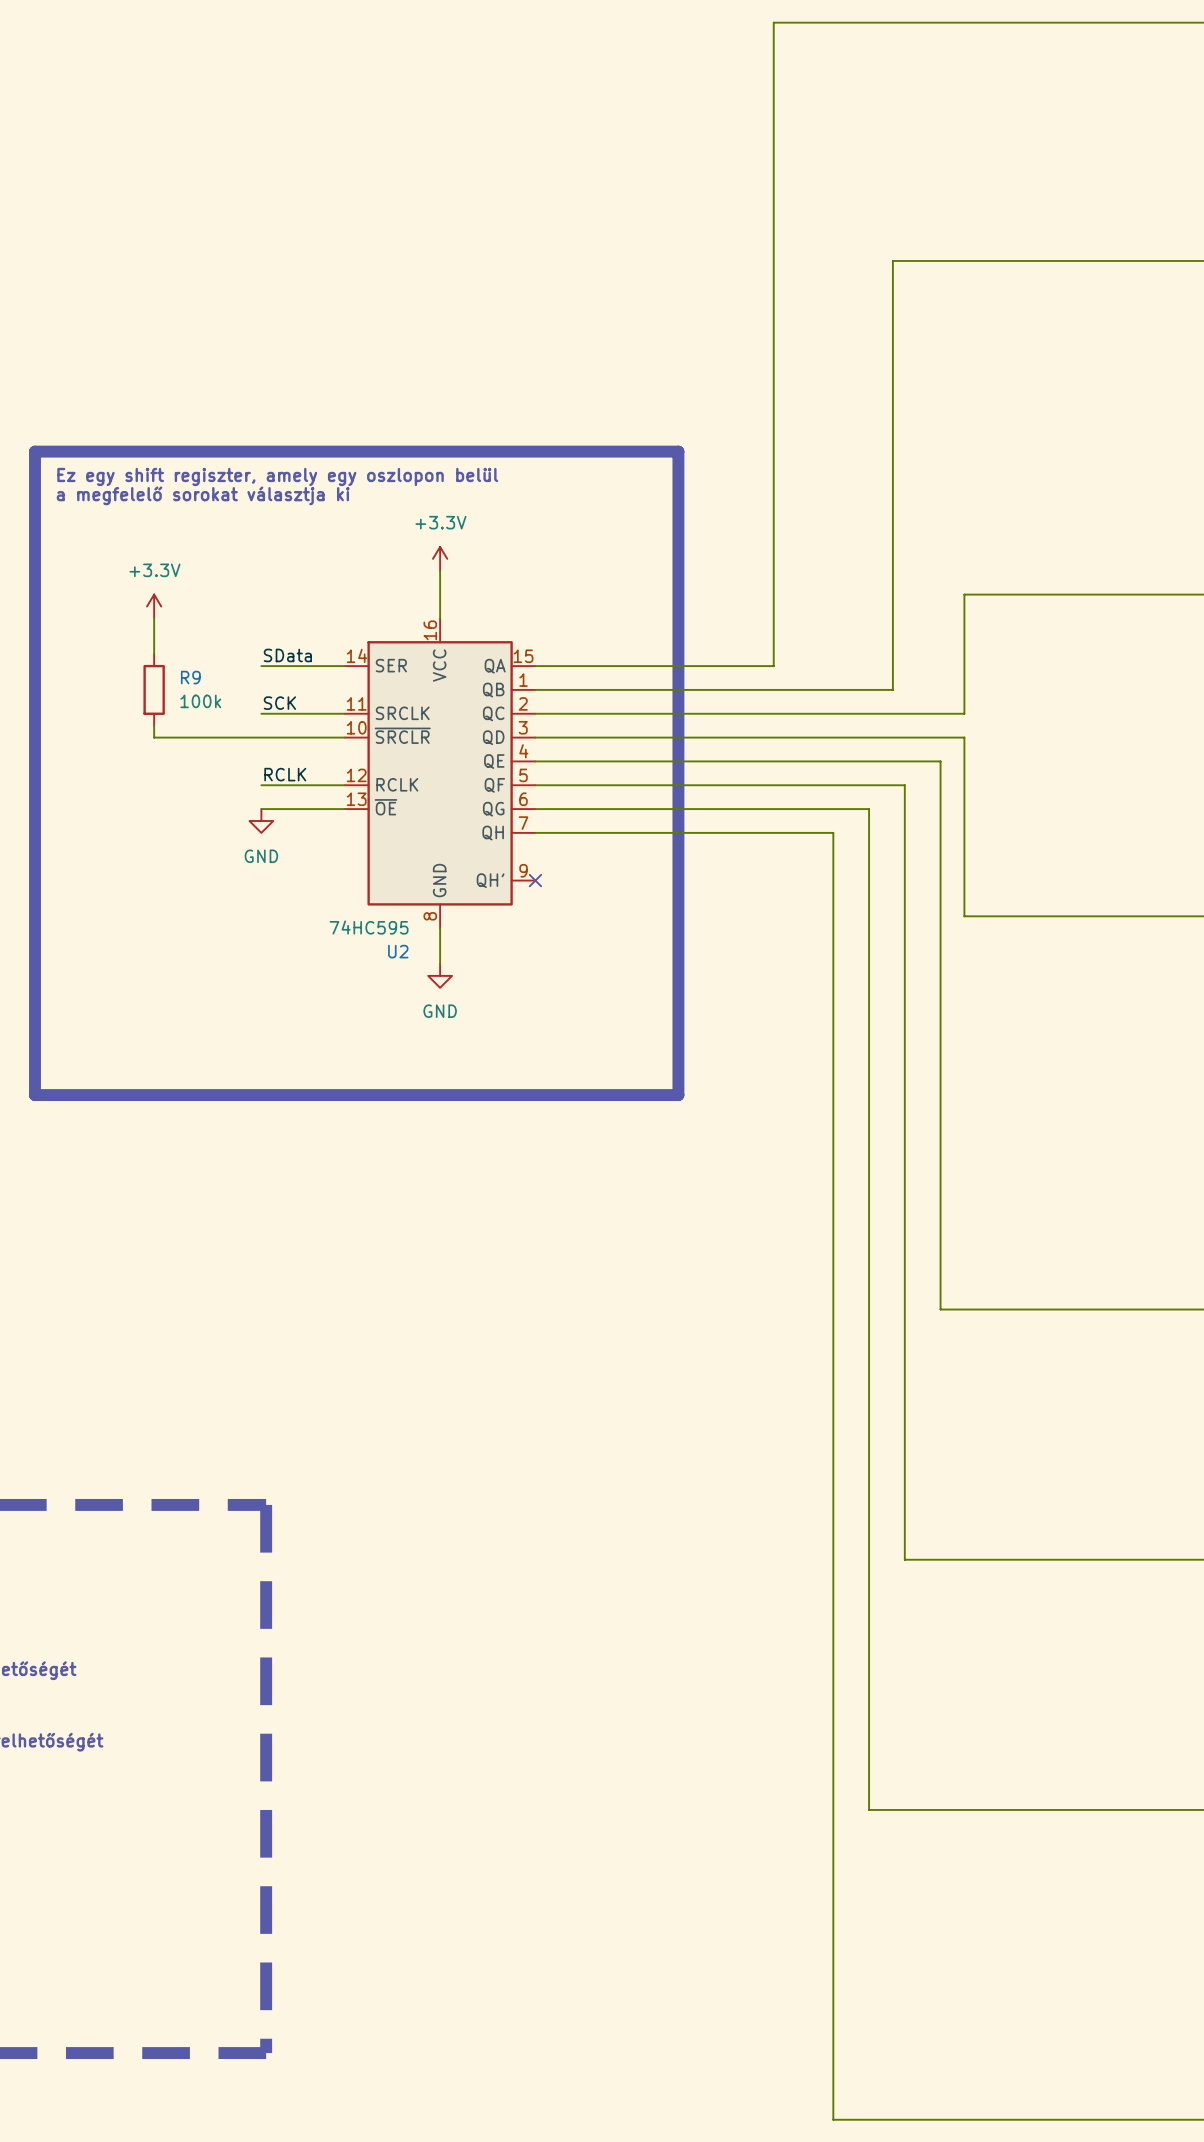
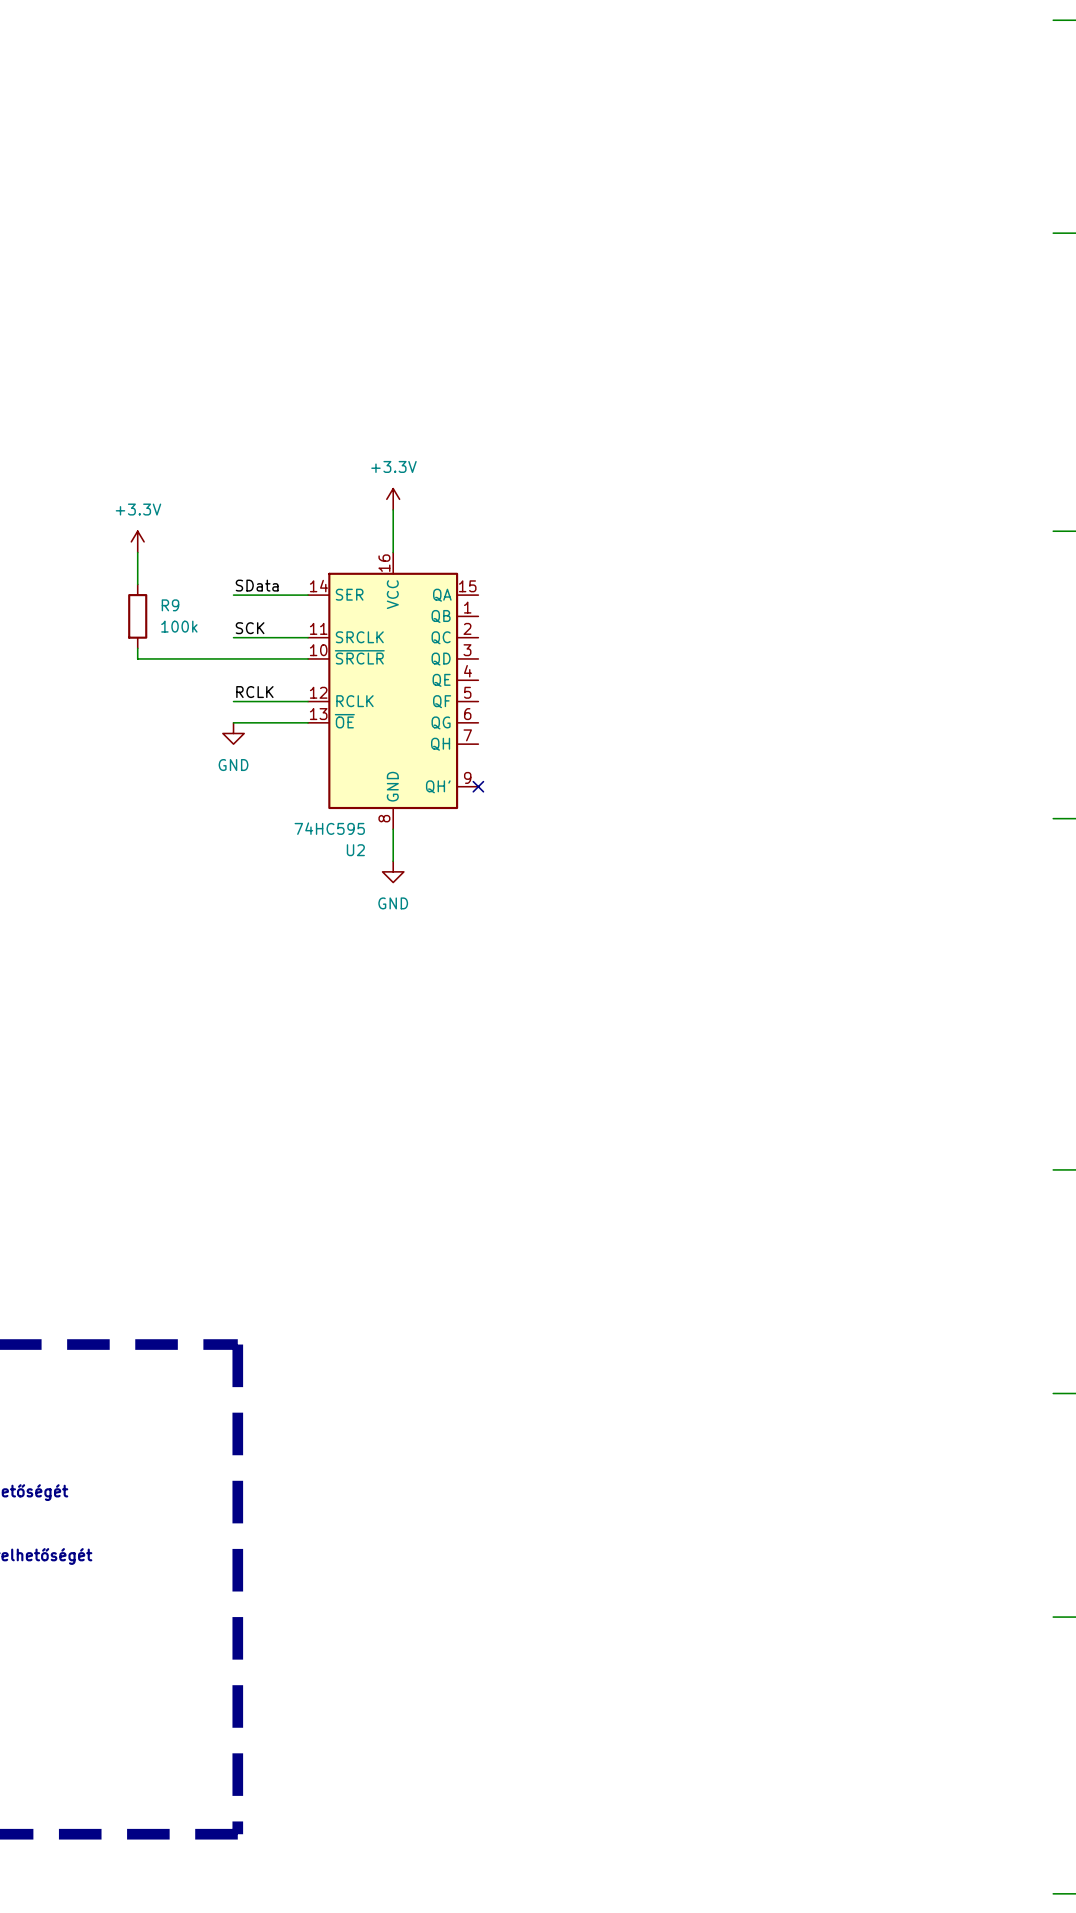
wire: (1178, 22) (773, 22) (773, 666) (535, 666) -> none
wire: (1178, 260) (892, 260) (892, 689) (535, 689) -> none
line: (34, 451) (678, 451) (678, 1095) (34, 1095) (34, 451) -> none
text: Ez egy shift regiszter, amely egy oszlopon belül (277, 476) -> none
text: a megfelelő sorokat választja ki (203, 495) -> none
wire: (1178, 594) (964, 594) (964, 713) (535, 713) -> none
wire: (535, 737) (964, 737) (964, 916) (1178, 916) -> none
wire: (535, 761) (940, 761) (940, 1309) (1178, 1309) -> none
wire: (535, 785) (904, 785) (904, 1559) (1178, 1559) -> none
wire: (535, 809) (869, 809) (869, 1809) (1178, 1809) -> none
wire: (535, 832) (833, 832) (833, 2119) (1178, 2119) -> none

